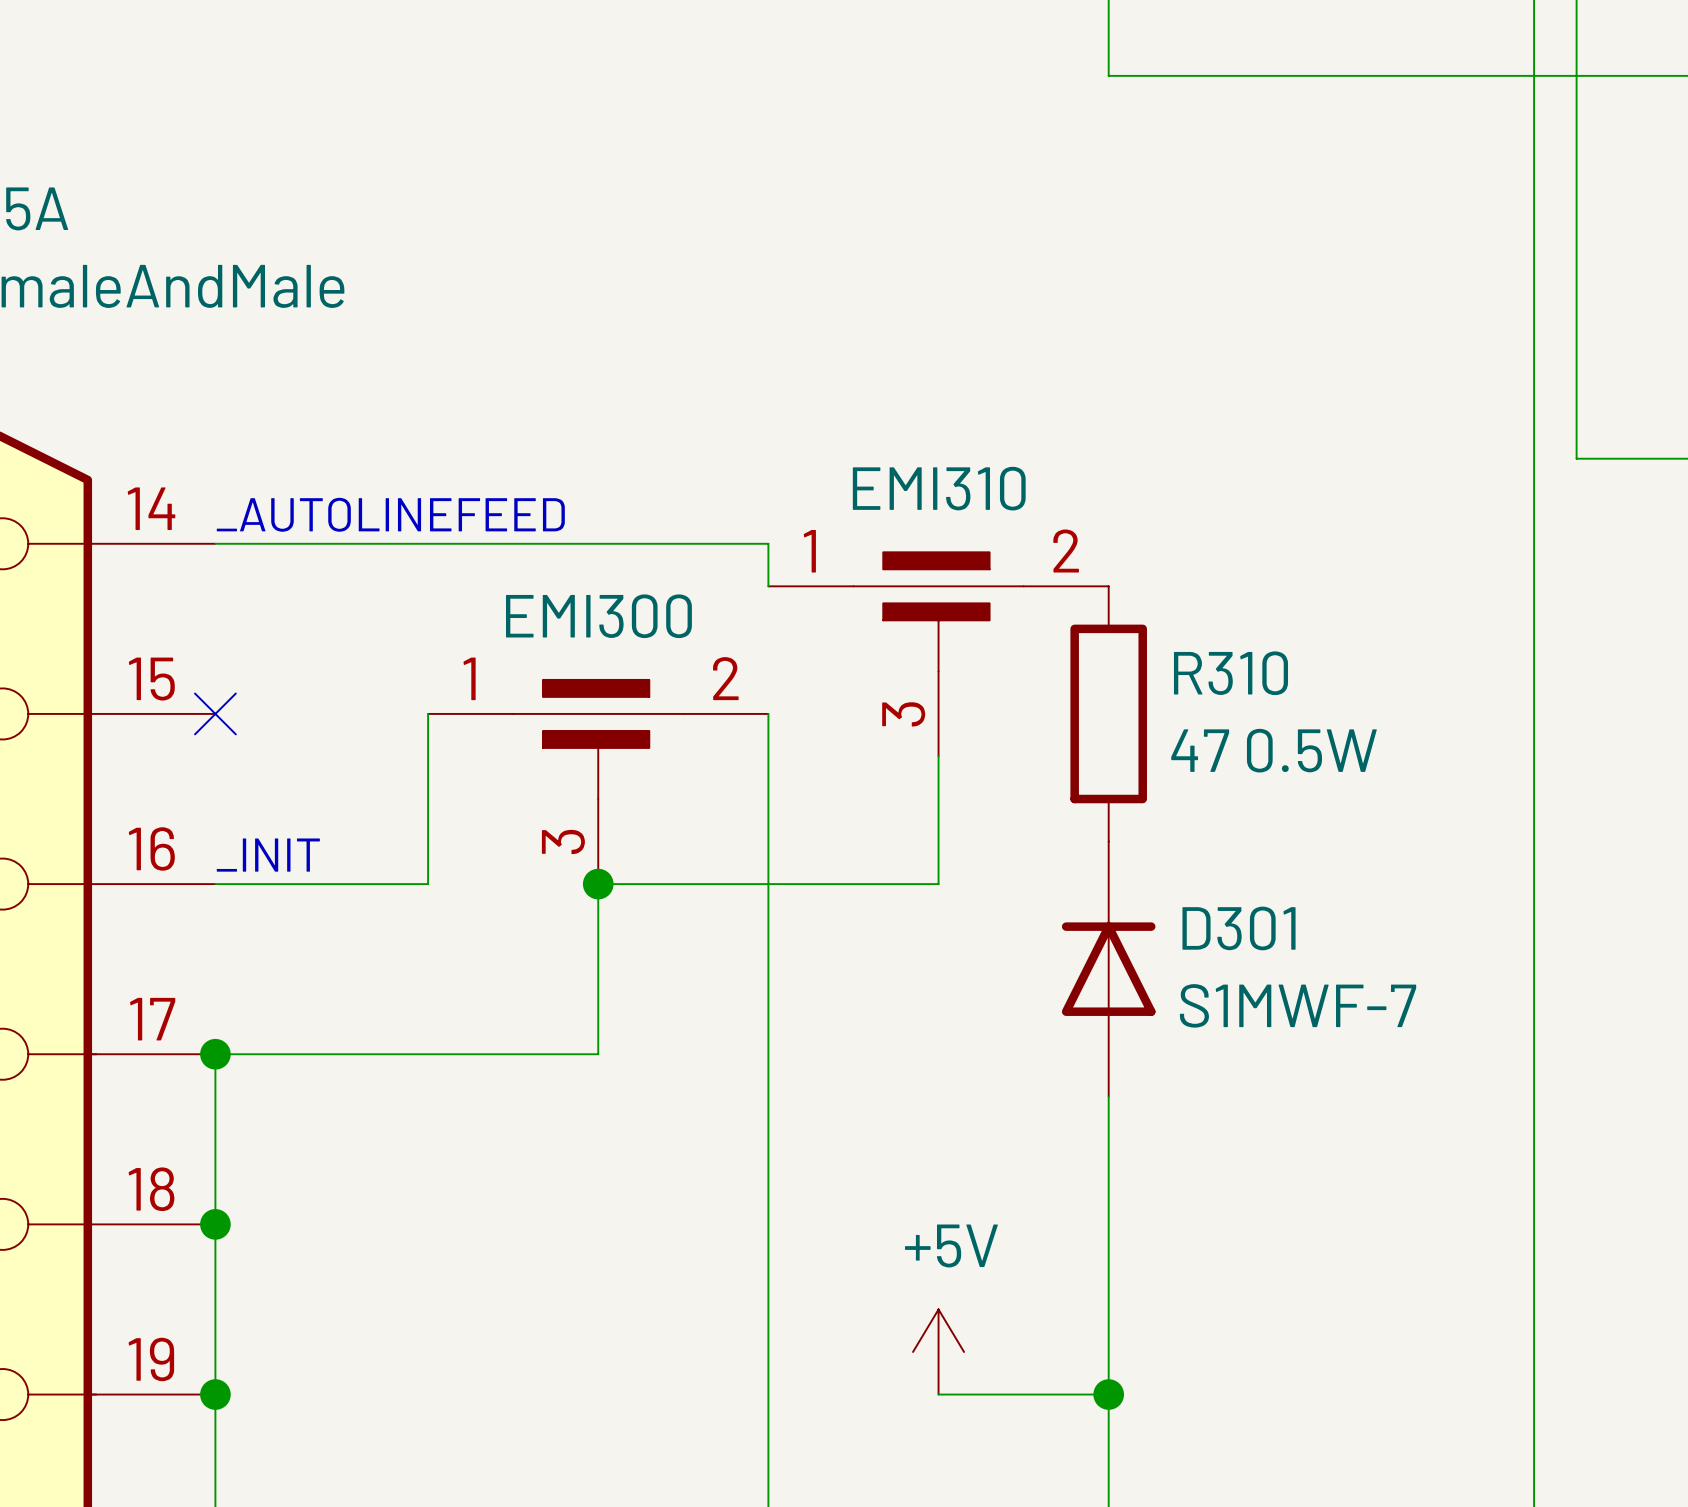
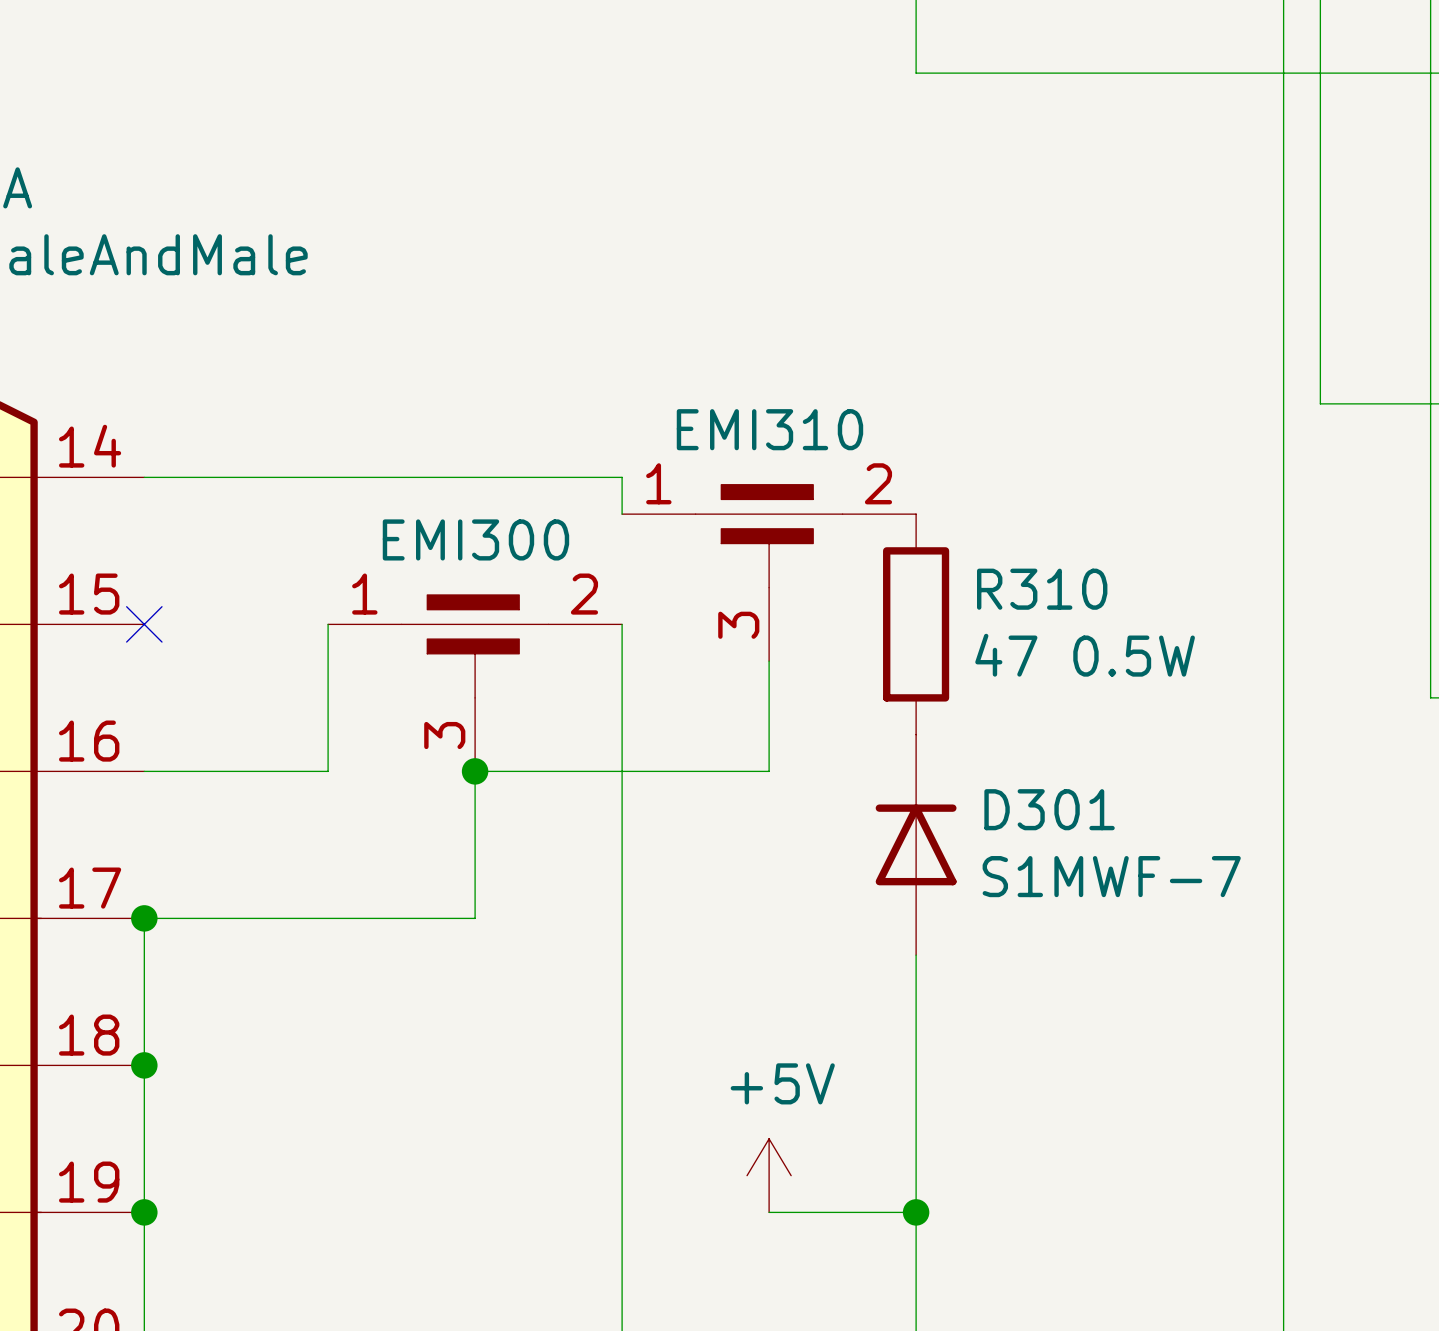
text: _AUTOLINEFEED (390, 514) -> none
text: _INIT (268, 855) -> none

